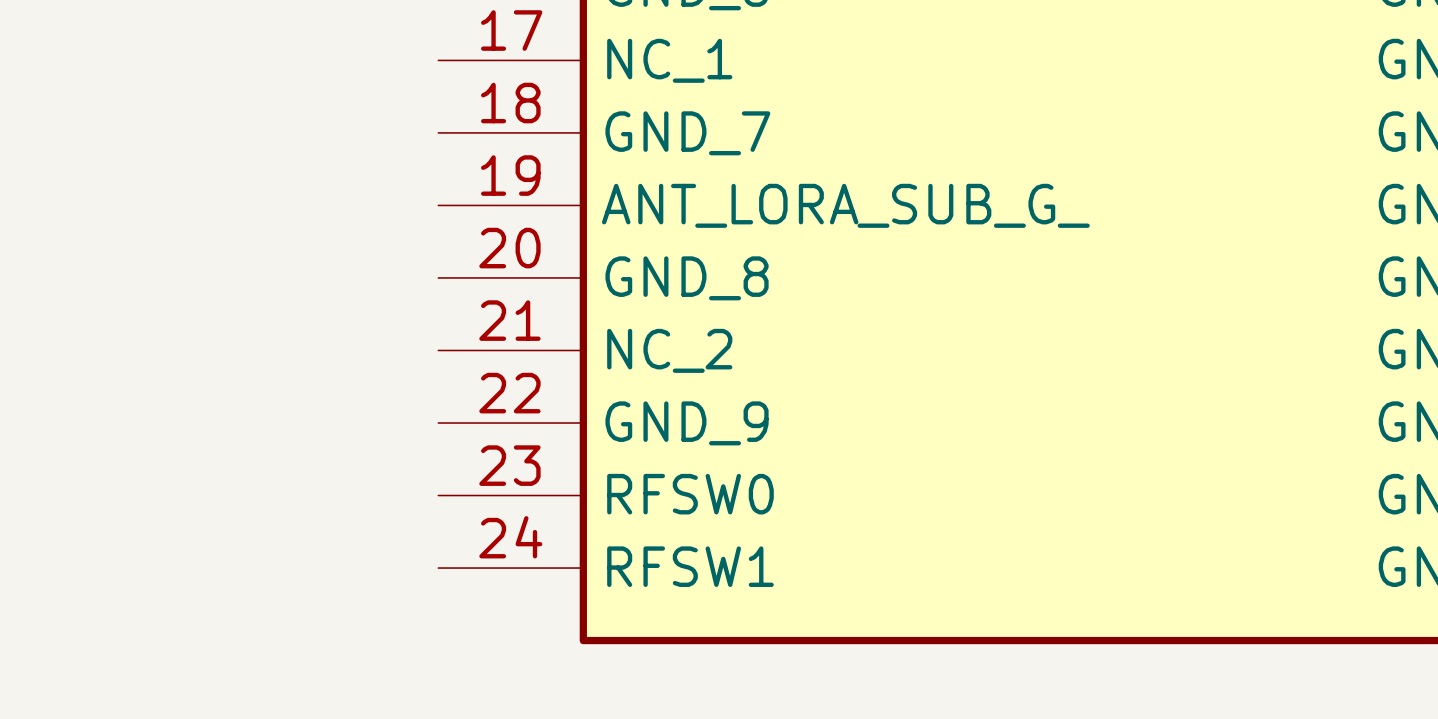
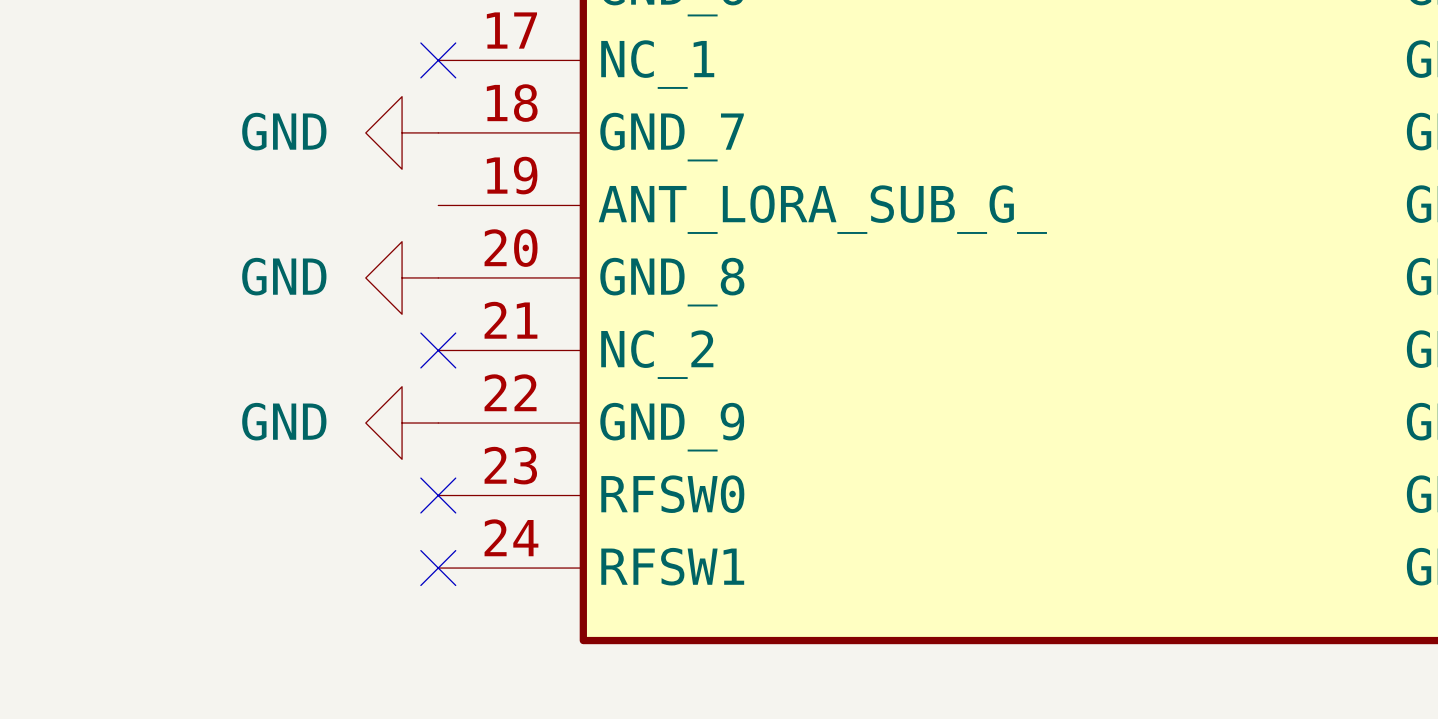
no-connect mark: none -> (438, 60)
power symbol: none -> GND (402, 132)
power symbol: none -> GND (402, 277)
no-connect mark: none -> (438, 350)
power symbol: none -> GND (402, 423)
no-connect mark: none -> (438, 495)
no-connect mark: none -> (438, 568)

